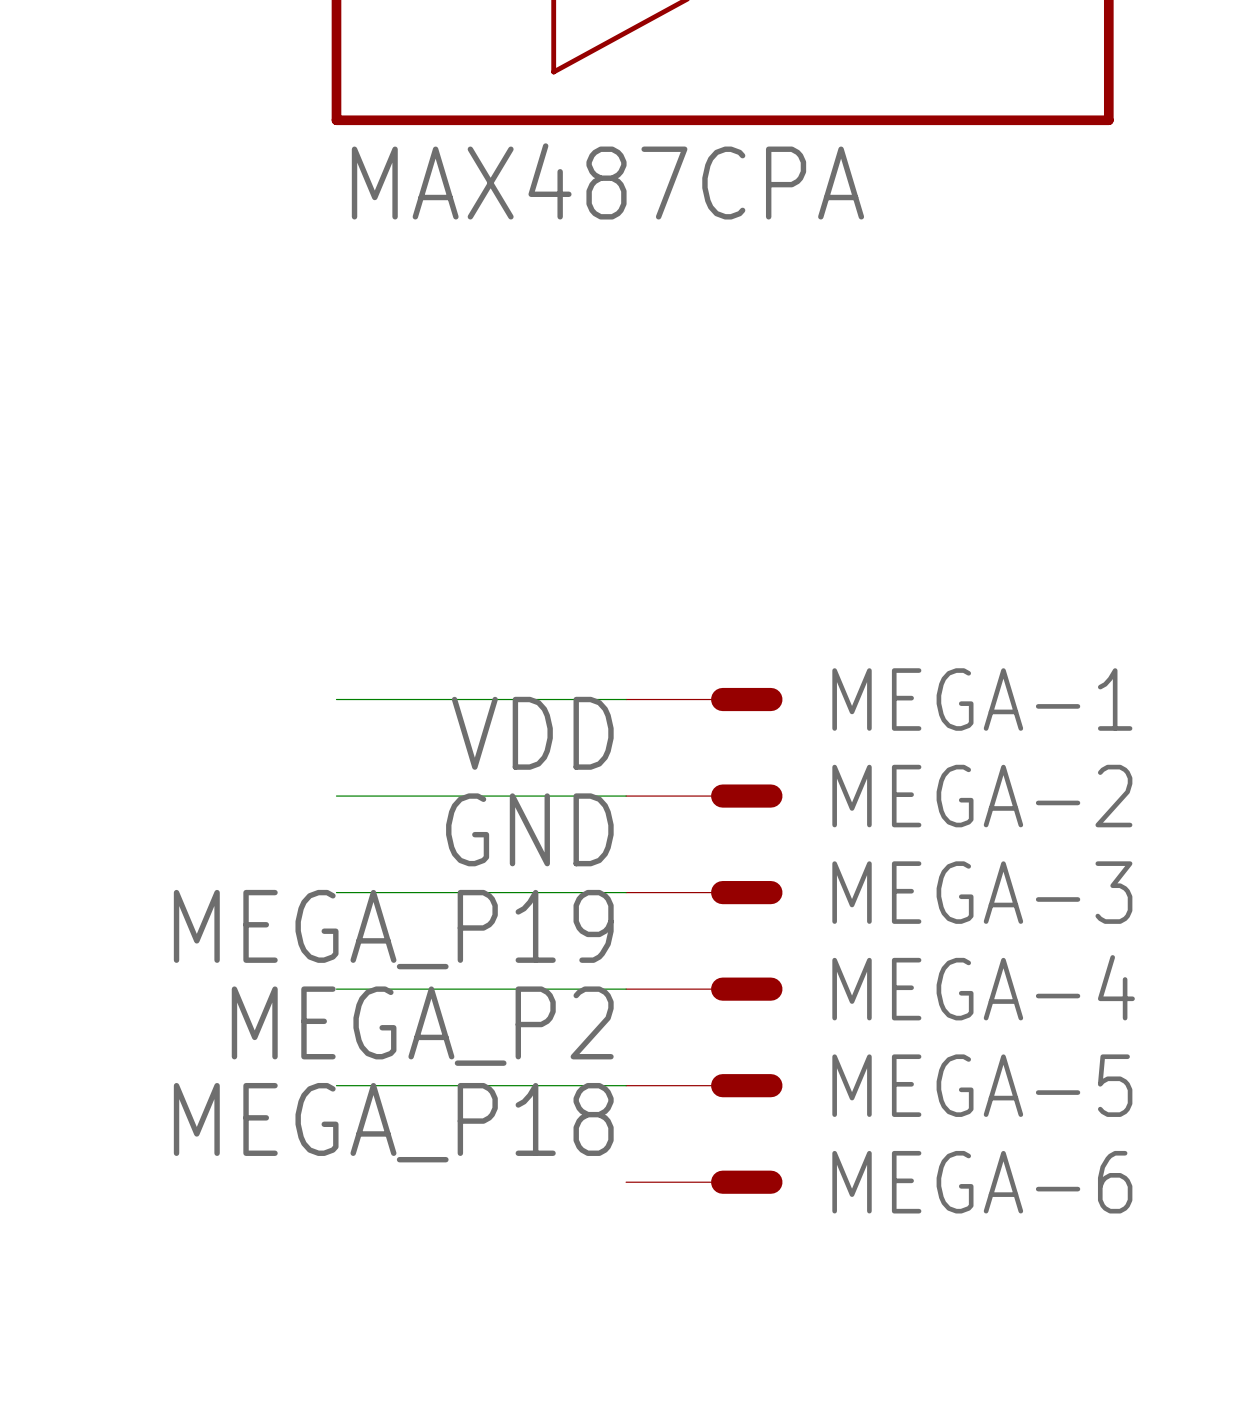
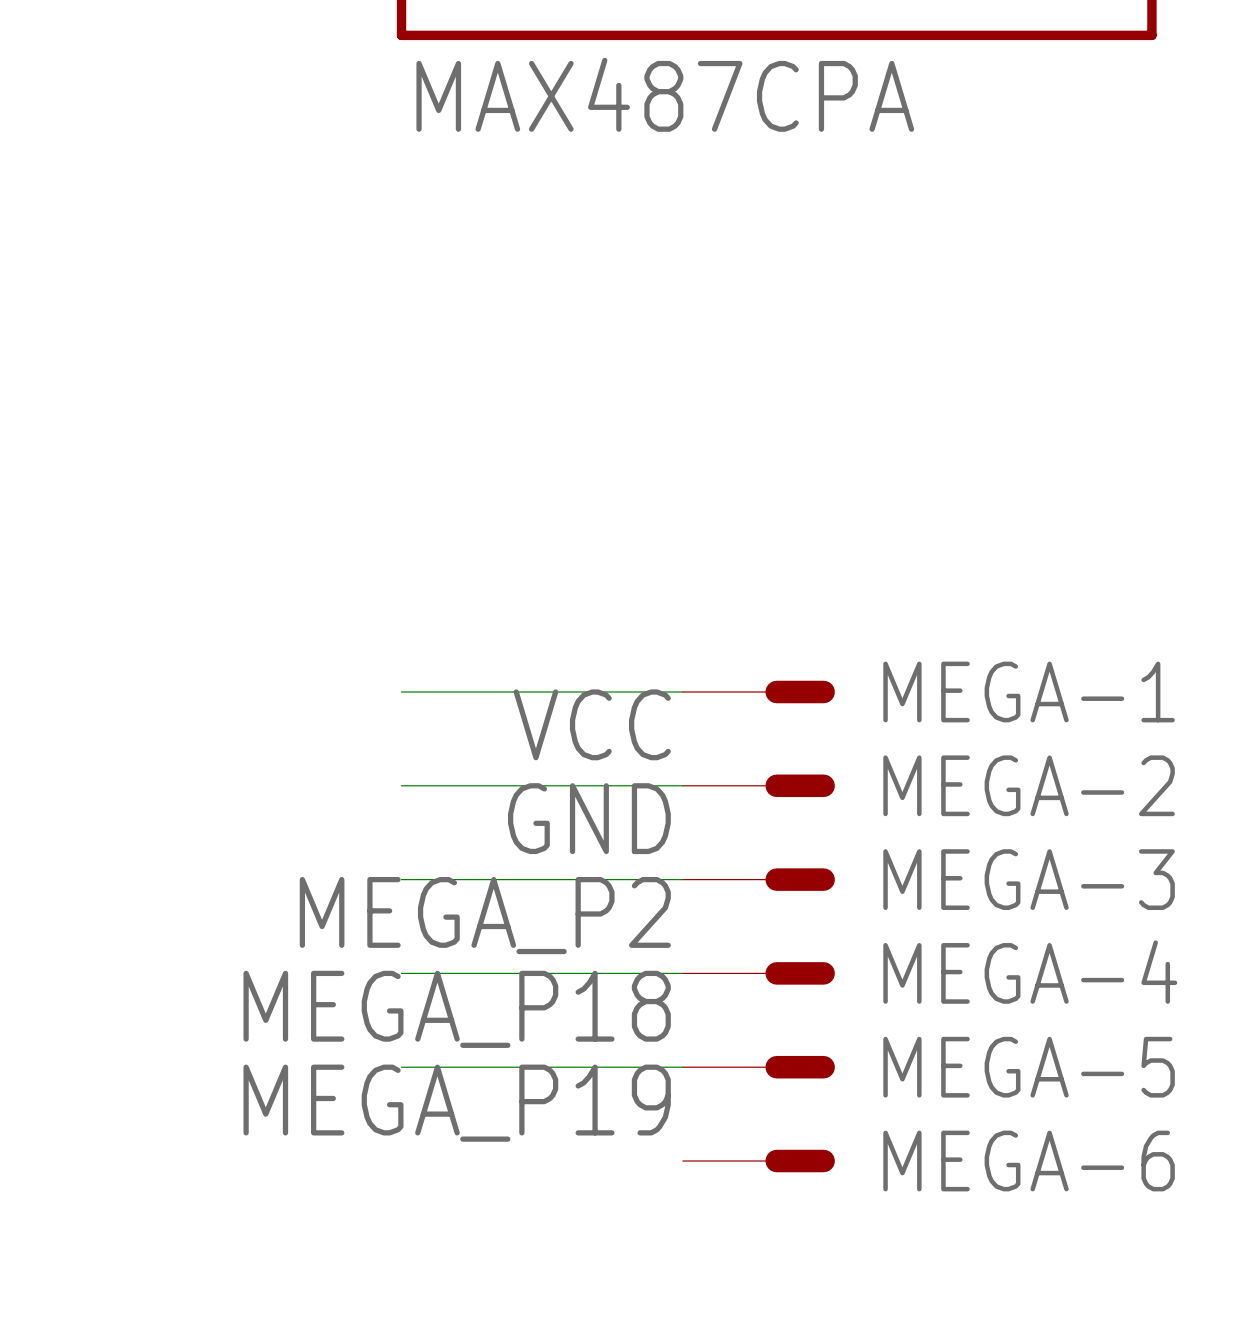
wire: (336, 699) (626, 699) -> (401, 1067) (682, 1067)
MEGA-1: (704, 699) -> none
label: VDD (532, 733) -> none
MEGA-2 name: MEGA-2 (982, 796) -> MEGA-1 (1029, 692)
label: GND (529, 829) -> VCC (592, 724)
MEGA-3 name: MEGA-3 (982, 892) -> MEGA-2 (1029, 785)
label: MEGA_P19 (393, 929) -> GND (589, 818)
MEGA-4 name: MEGA-4 (983, 987) -> MEGA-3 (1029, 879)
MEGA-5 name: MEGA-5 (982, 1085) -> MEGA-4 (1030, 972)
MEGA-6 name: MEGA-6 (982, 1182) -> MEGA-5 (1029, 1067)
label: none -> MEGA_P19 (457, 1103)
MEGA-6: none -> (758, 1161)

